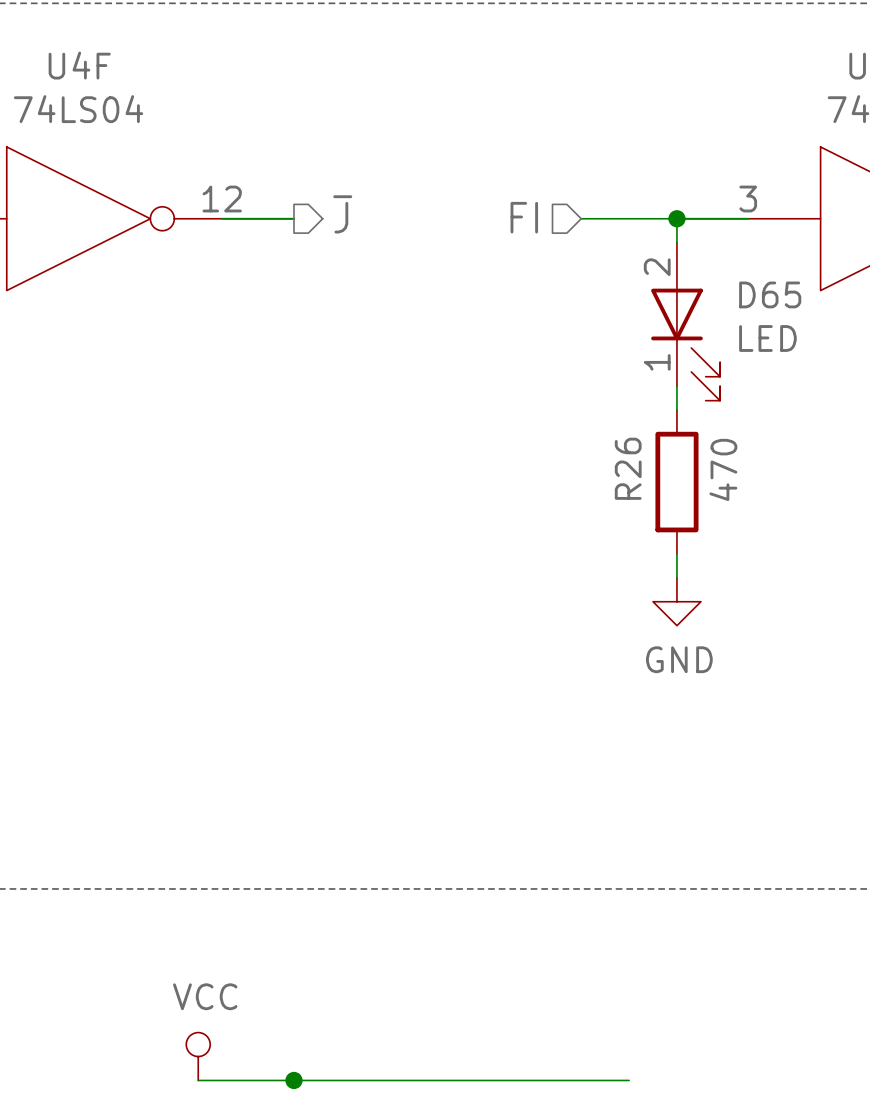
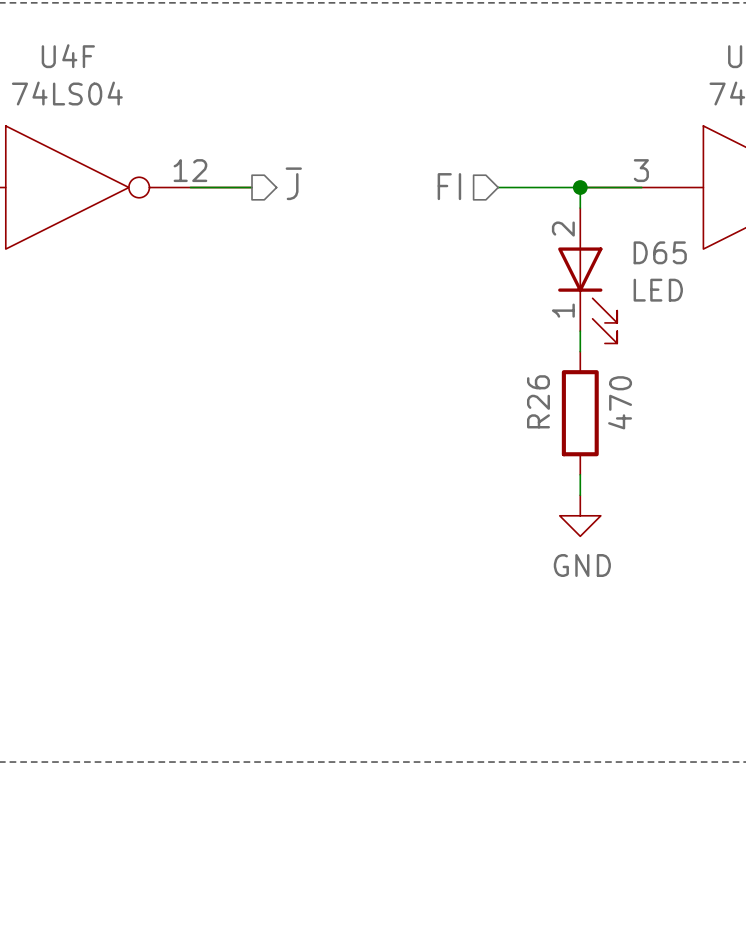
power symbol: VCC (198, 1056) -> none
wire: (198, 1080) (629, 1080) -> none
junction: (293, 1080) -> none

